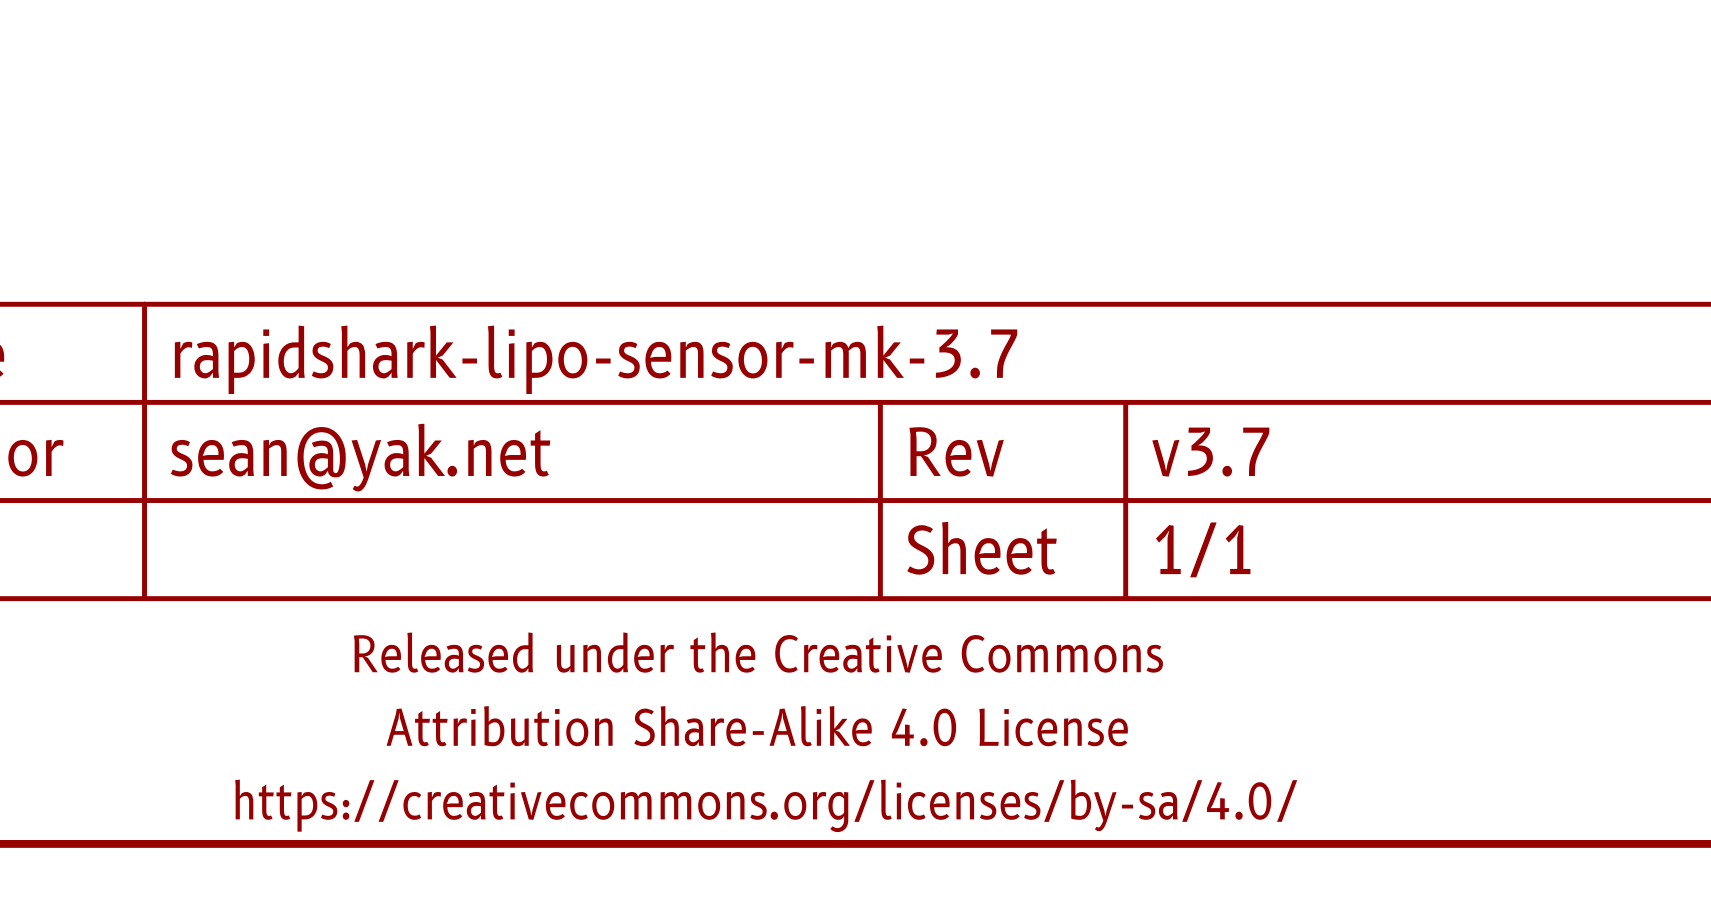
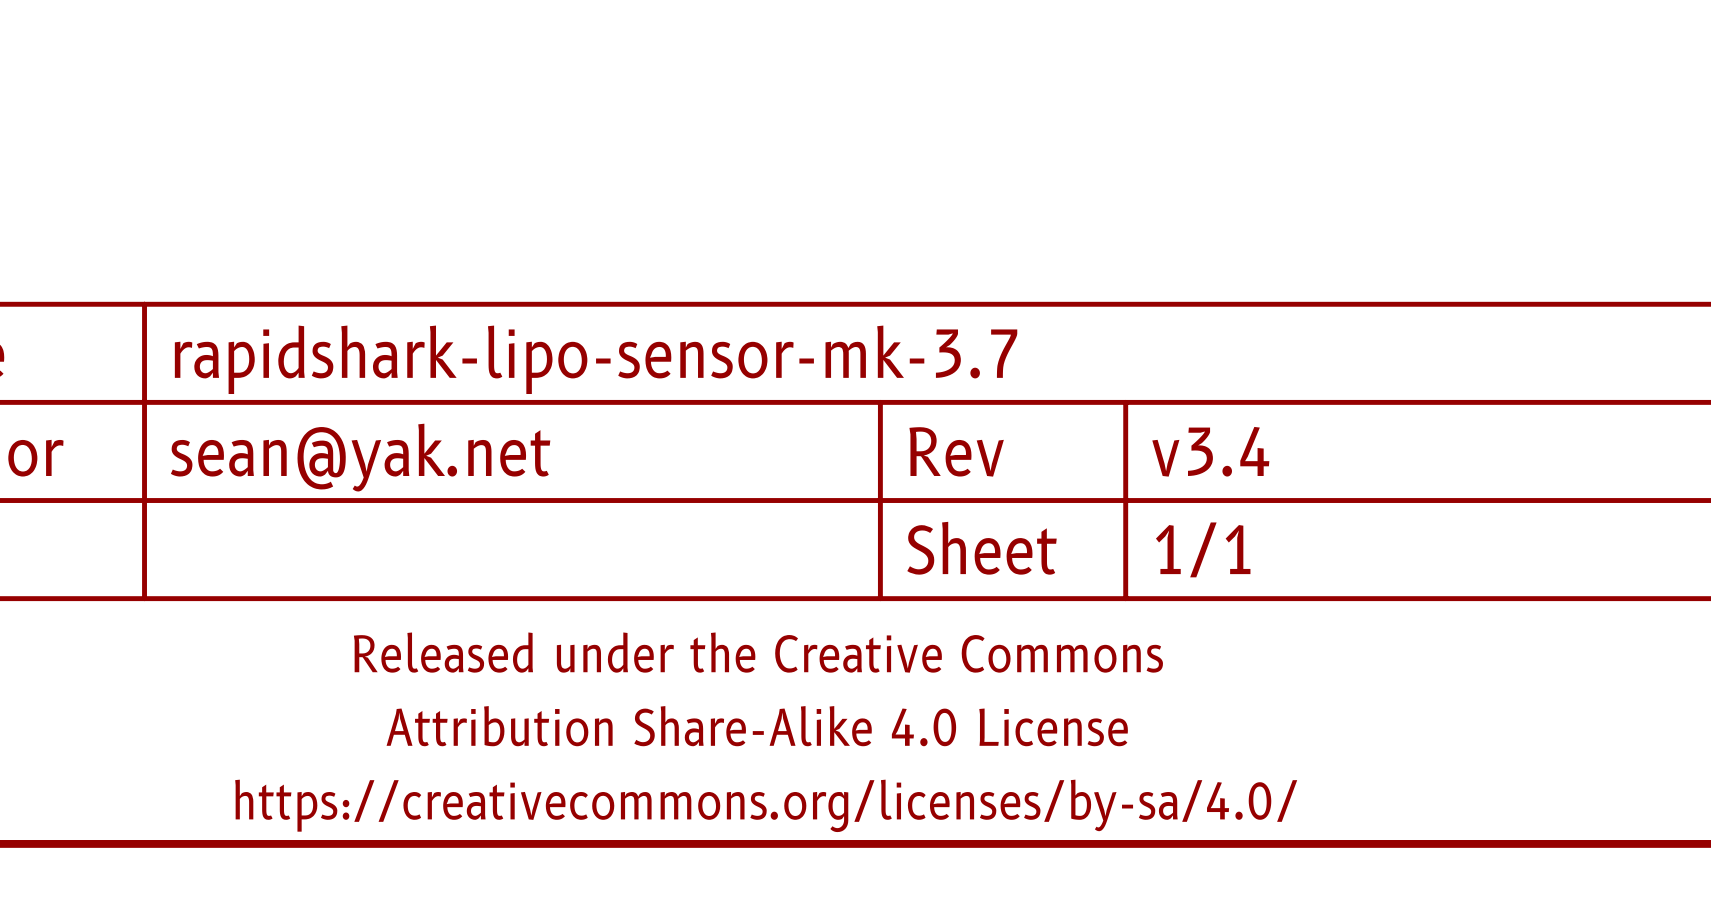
part text: v3.7 (1210, 452) -> v3.4 (1210, 451)

